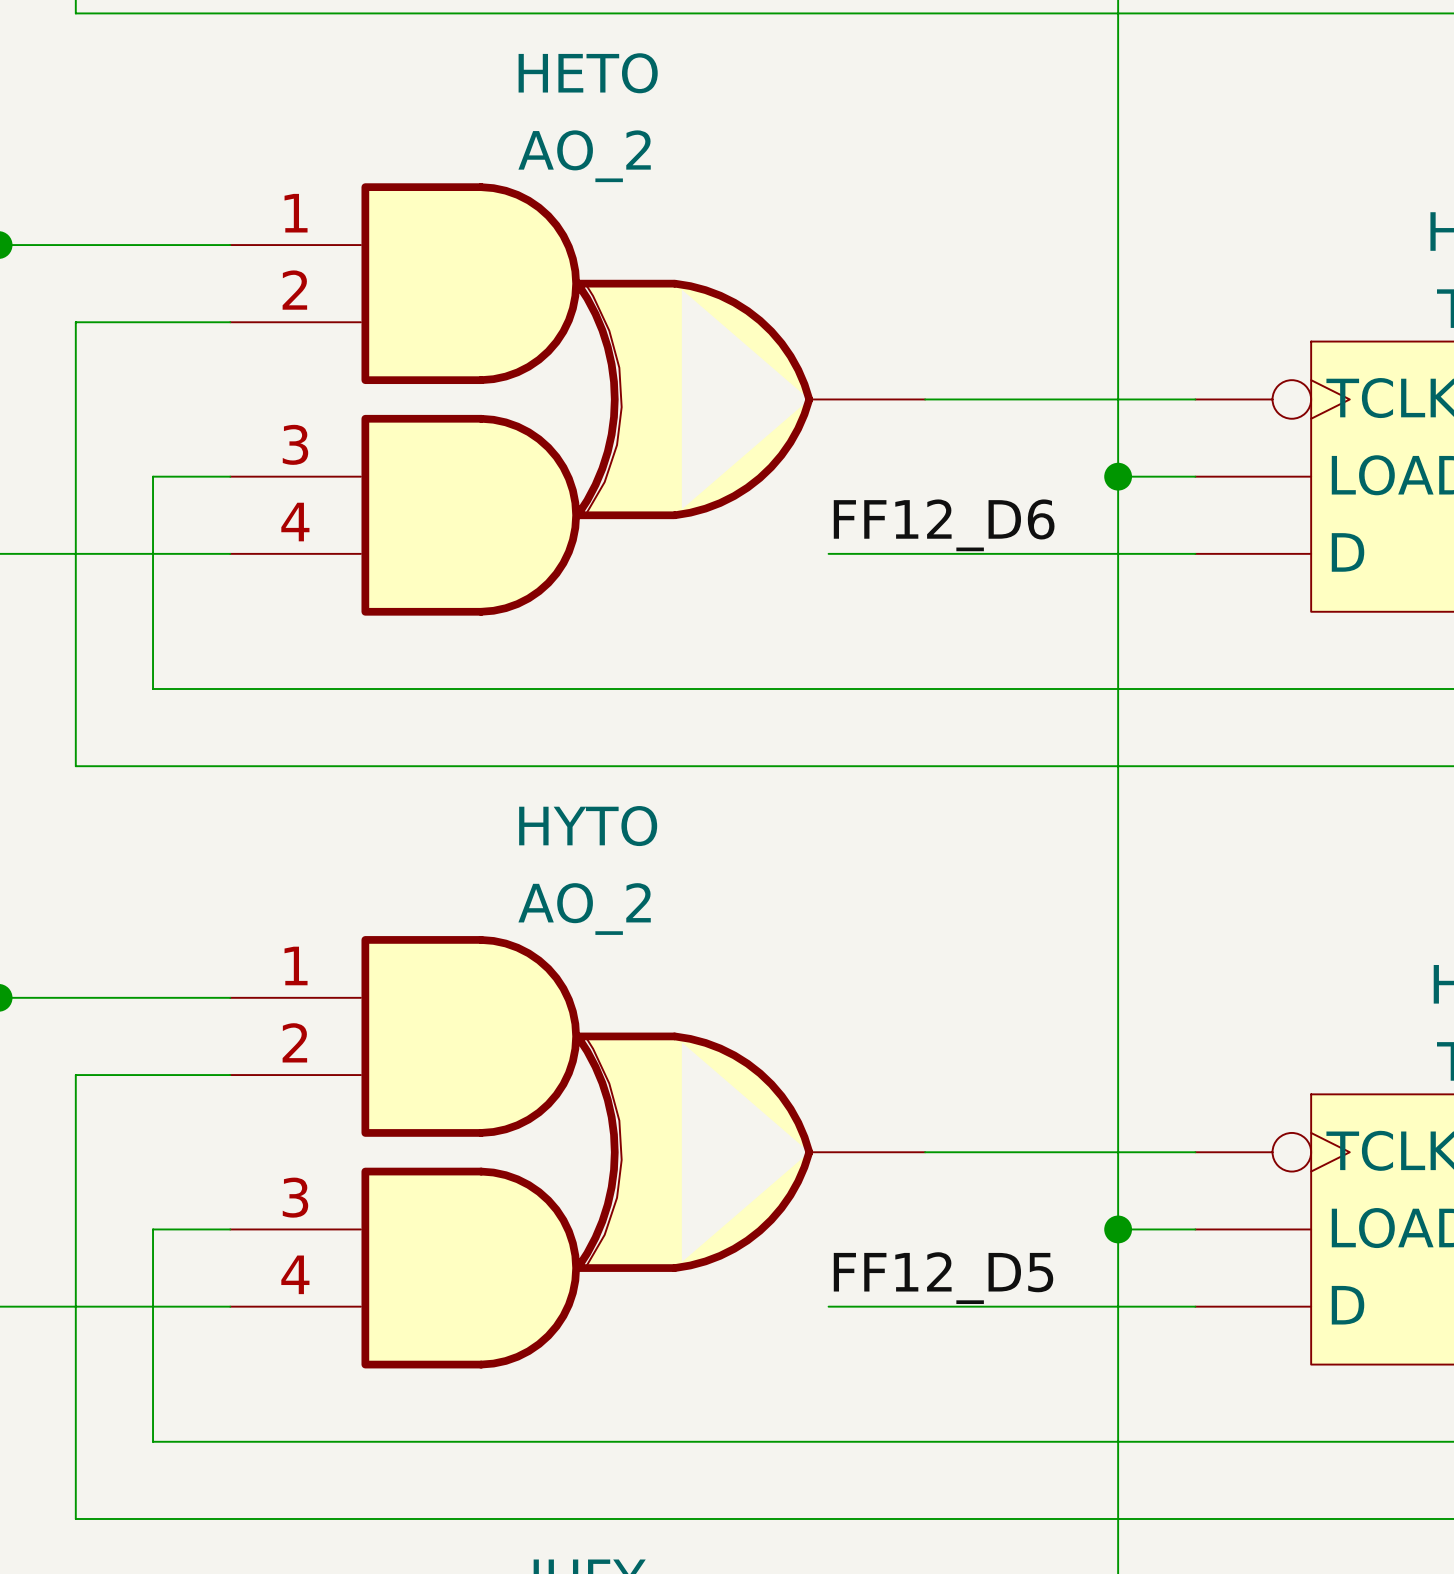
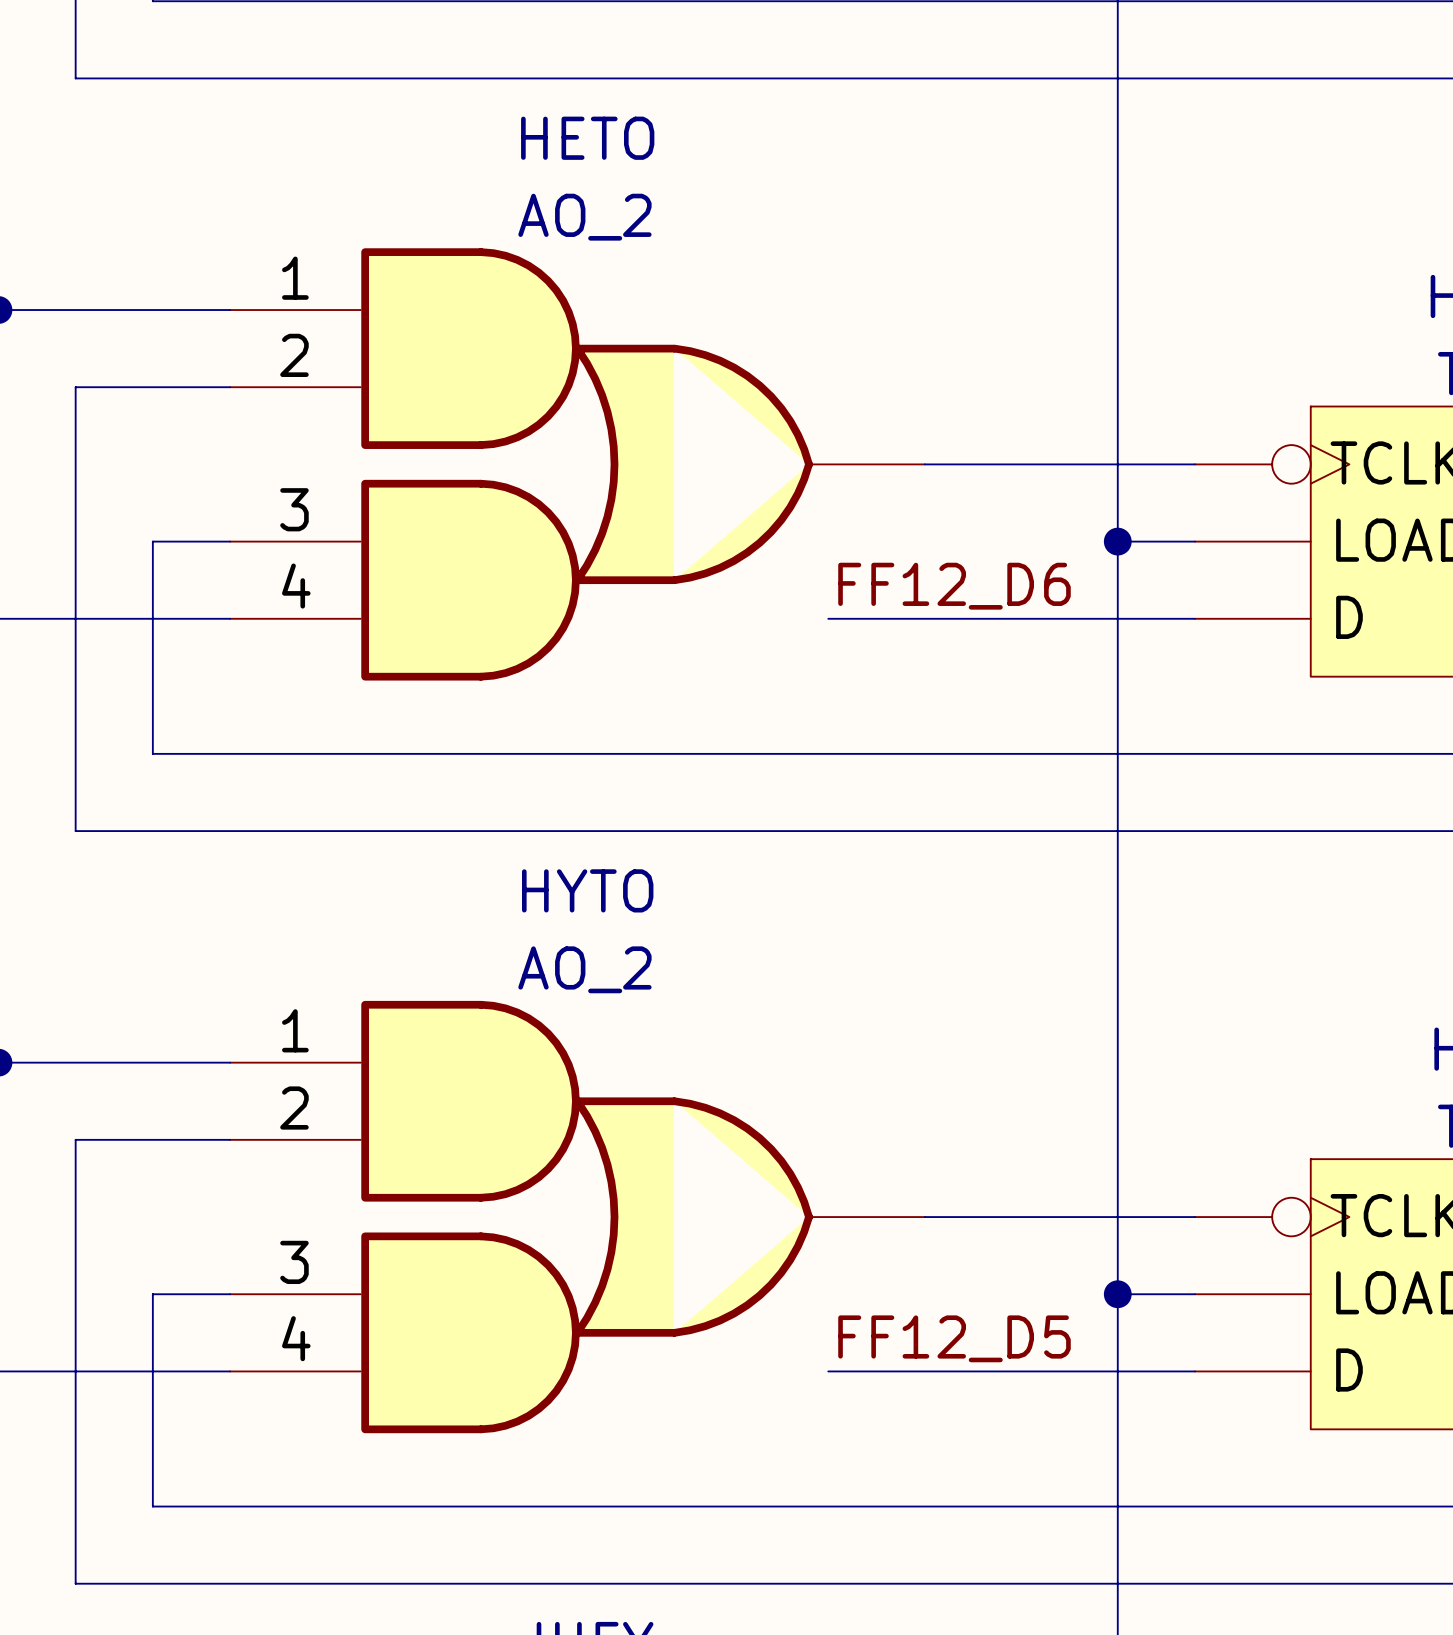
HETO symbol: [230, 183, 926, 616] -> [230, 248, 925, 681]
HYTO symbol: [230, 936, 926, 1369] -> [230, 1000, 925, 1434]

